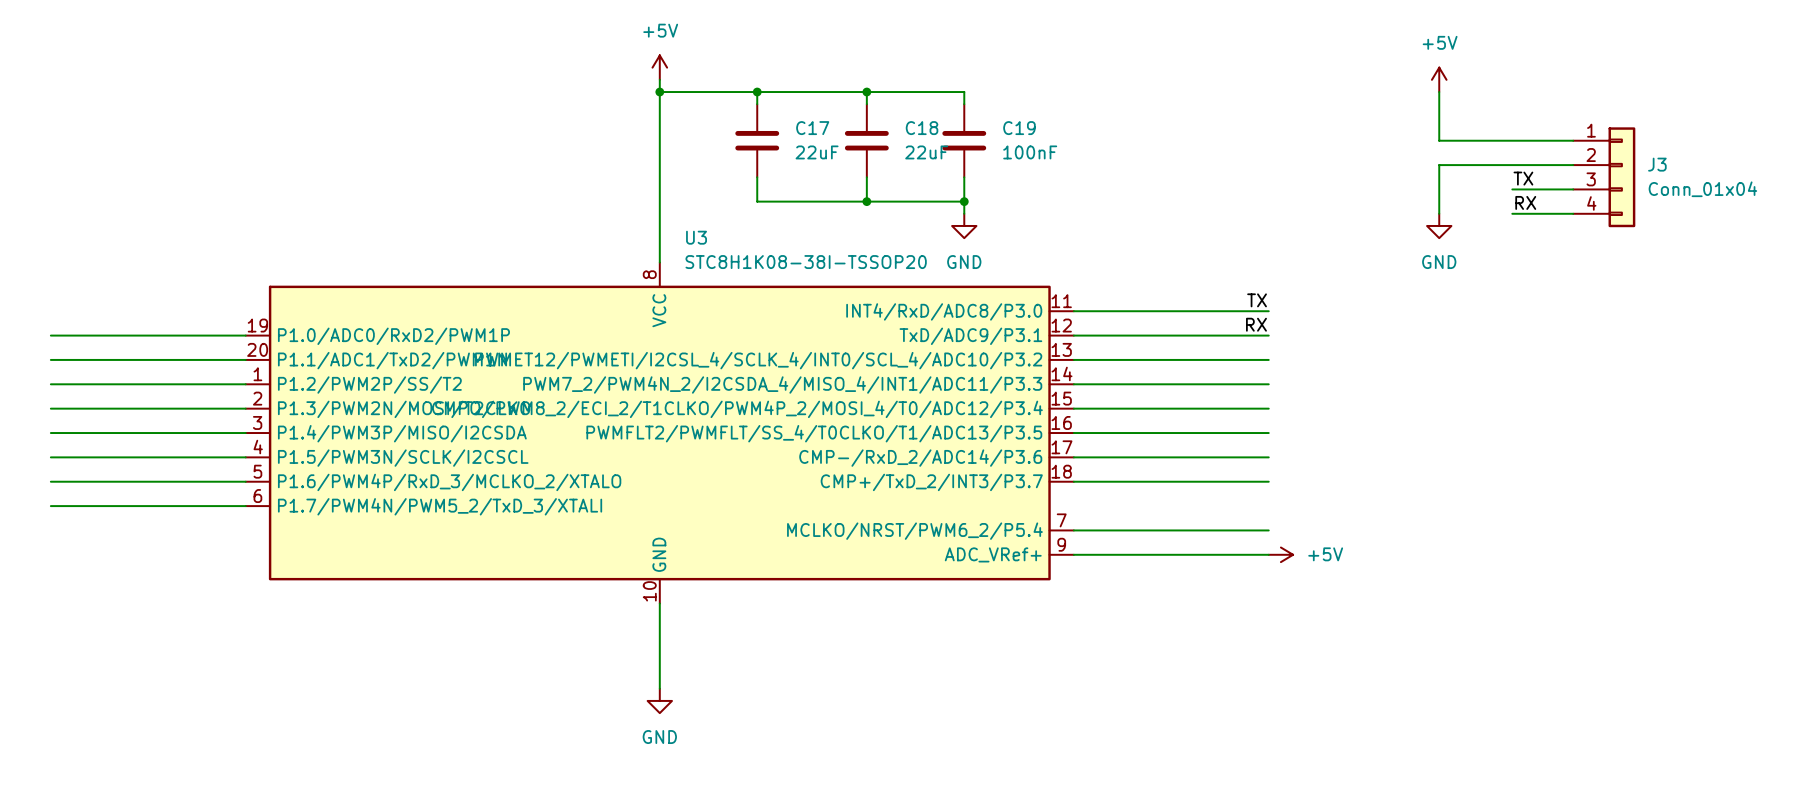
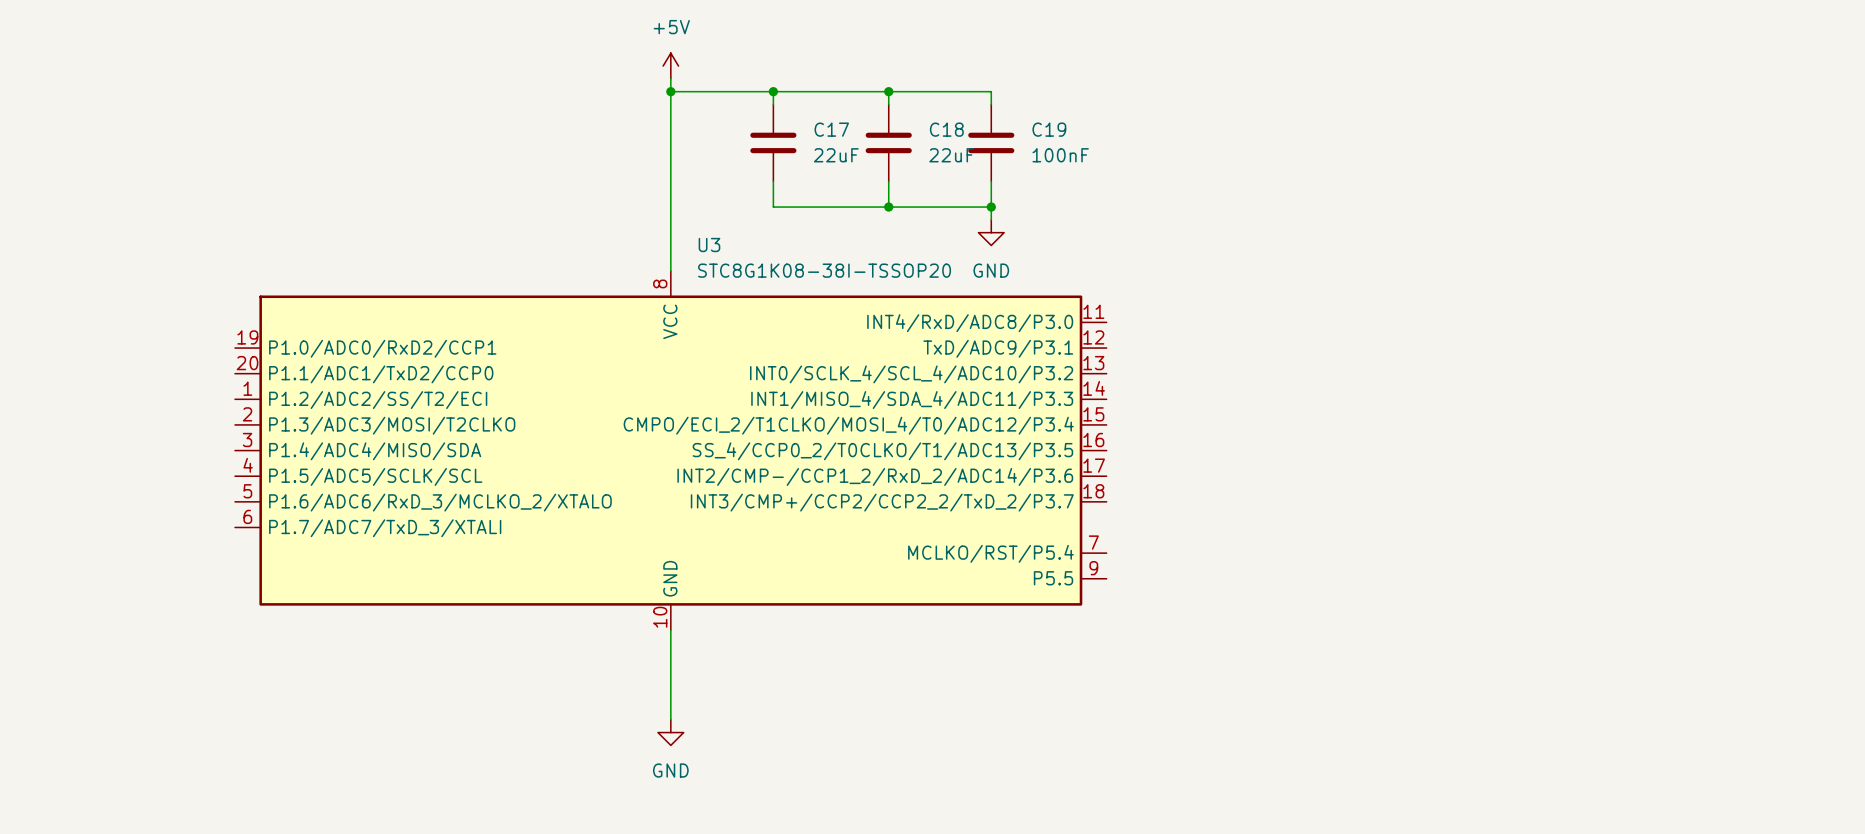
power symbol: +5V (1439, 79) -> none
wire: (1439, 92) (1439, 140) (1573, 140) -> none
wire: (1573, 165) (1439, 165) (1439, 213) -> none
J3: Conn_01x04 (1604, 177) -> none
label: TX (1523, 178) -> none
wire: (1512, 189) (1573, 189) -> none
label: RX (1525, 202) -> none
wire: (1512, 213) (1573, 213) -> none
power symbol: GND (1439, 225) -> none
U3 symbol: [245, 262, 1074, 604] -> [235, 271, 1107, 631]
U3 value: STC8H1K08-38I-TSSOP20 (806, 262) -> STC8G1K08-38I-TSSOP20 (824, 270)
label: TX (1257, 300) -> none
wire: (1073, 311) (1268, 311) -> none
label: RX (1256, 324) -> none
wire: (50, 335) (245, 335) -> none
wire: (1073, 335) (1268, 335) -> none
wire: (50, 359) (245, 359) -> none
wire: (1073, 359) (1268, 359) -> none
wire: (50, 384) (245, 384) -> none
wire: (1073, 384) (1268, 384) -> none
wire: (50, 408) (245, 408) -> none
wire: (1073, 408) (1268, 408) -> none
wire: (50, 433) (245, 433) -> none
wire: (1073, 433) (1268, 433) -> none
wire: (50, 457) (245, 457) -> none
wire: (1073, 457) (1268, 457) -> none
wire: (50, 481) (245, 481) -> none
wire: (1073, 481) (1268, 481) -> none
wire: (50, 506) (245, 506) -> none
wire: (1073, 530) (1268, 530) -> none
wire: (1073, 554) (1268, 554) -> none
power symbol: +5V (1280, 554) -> none

